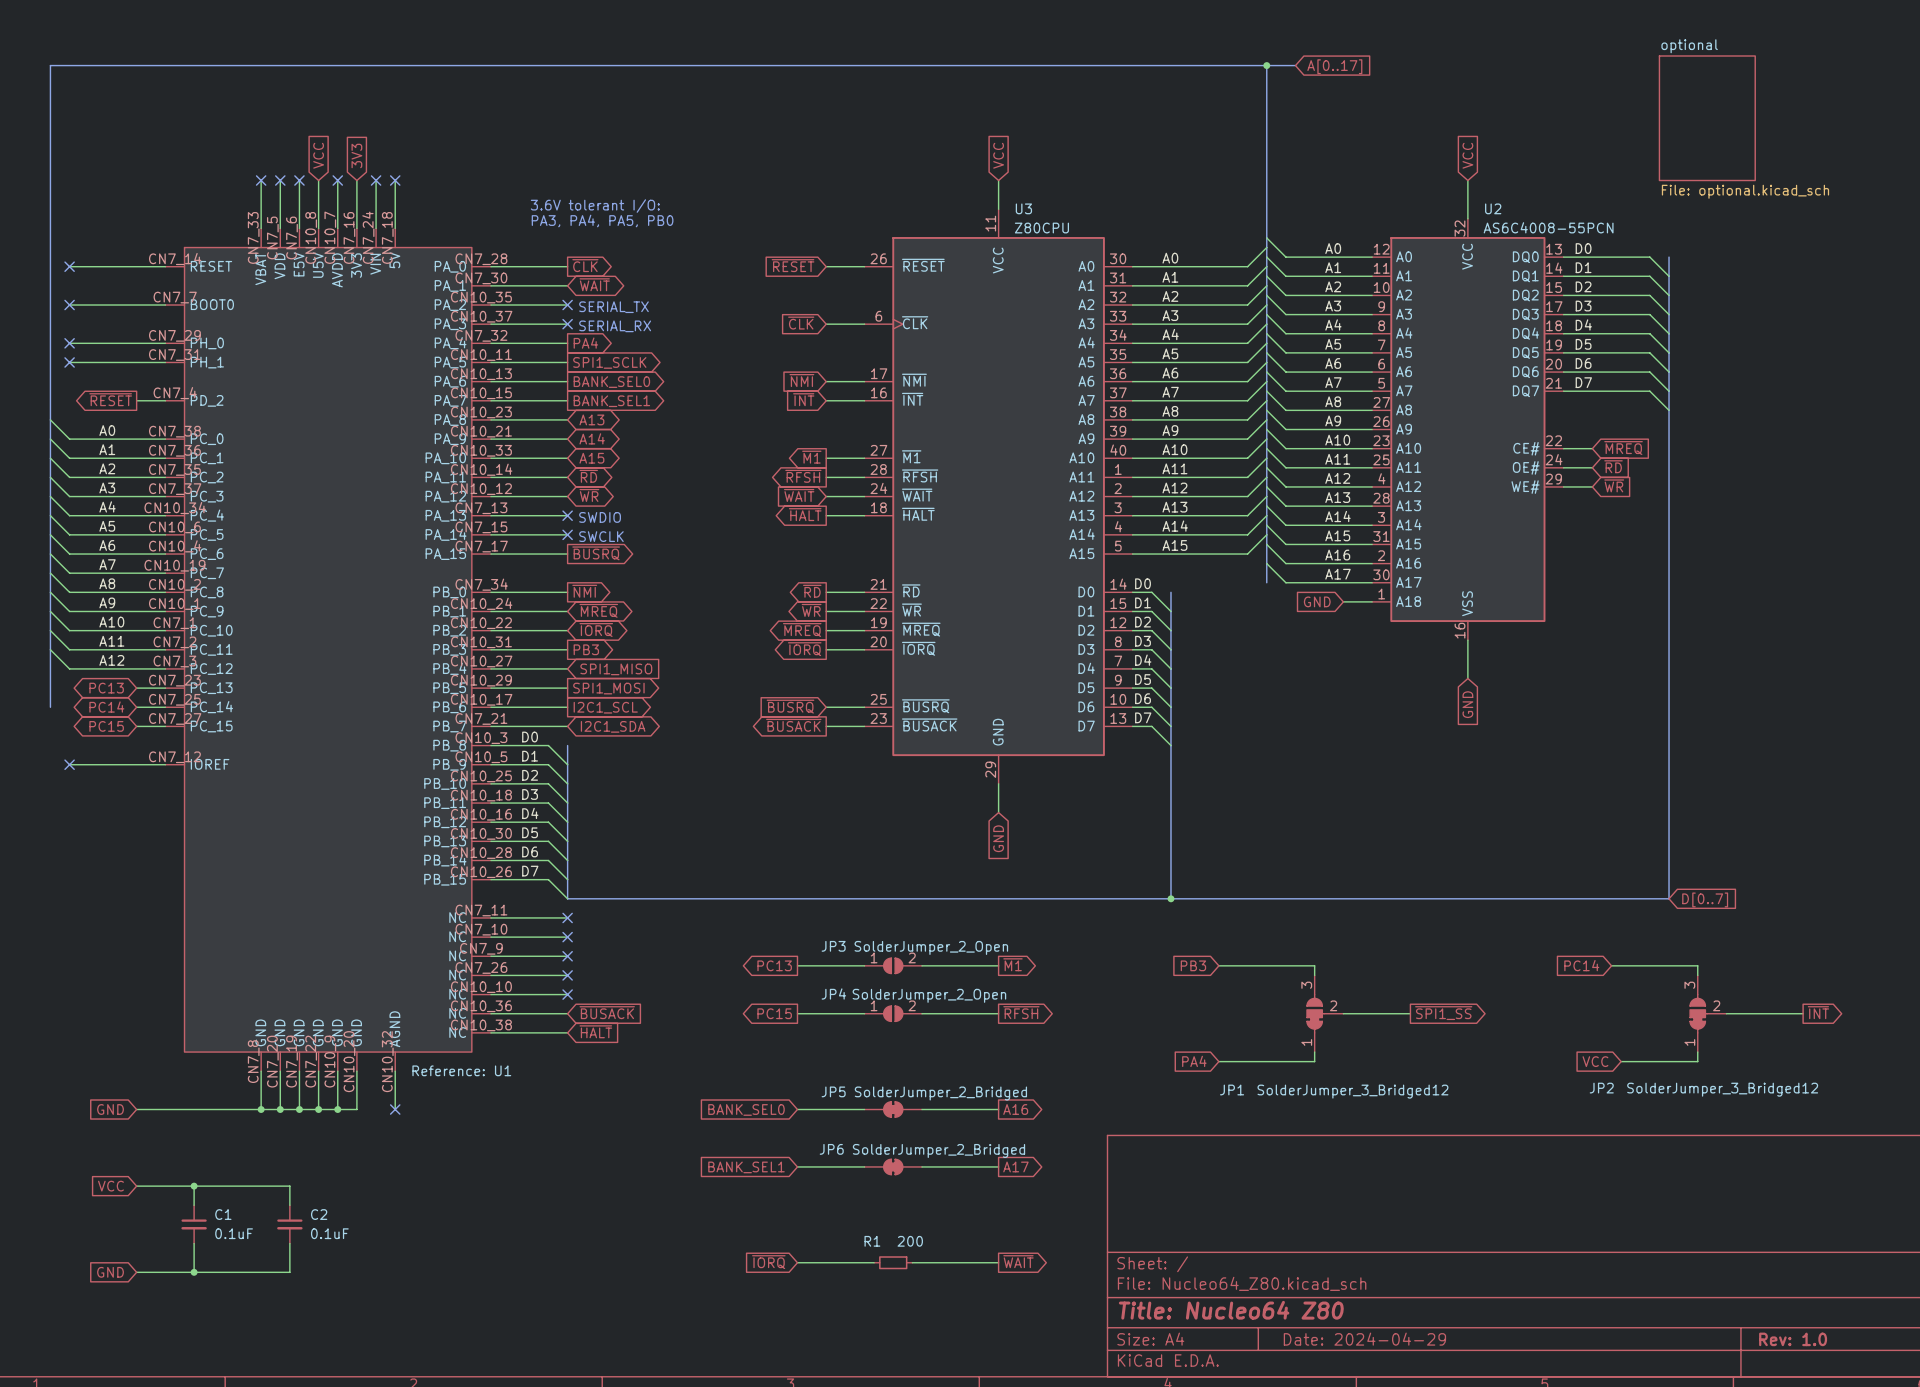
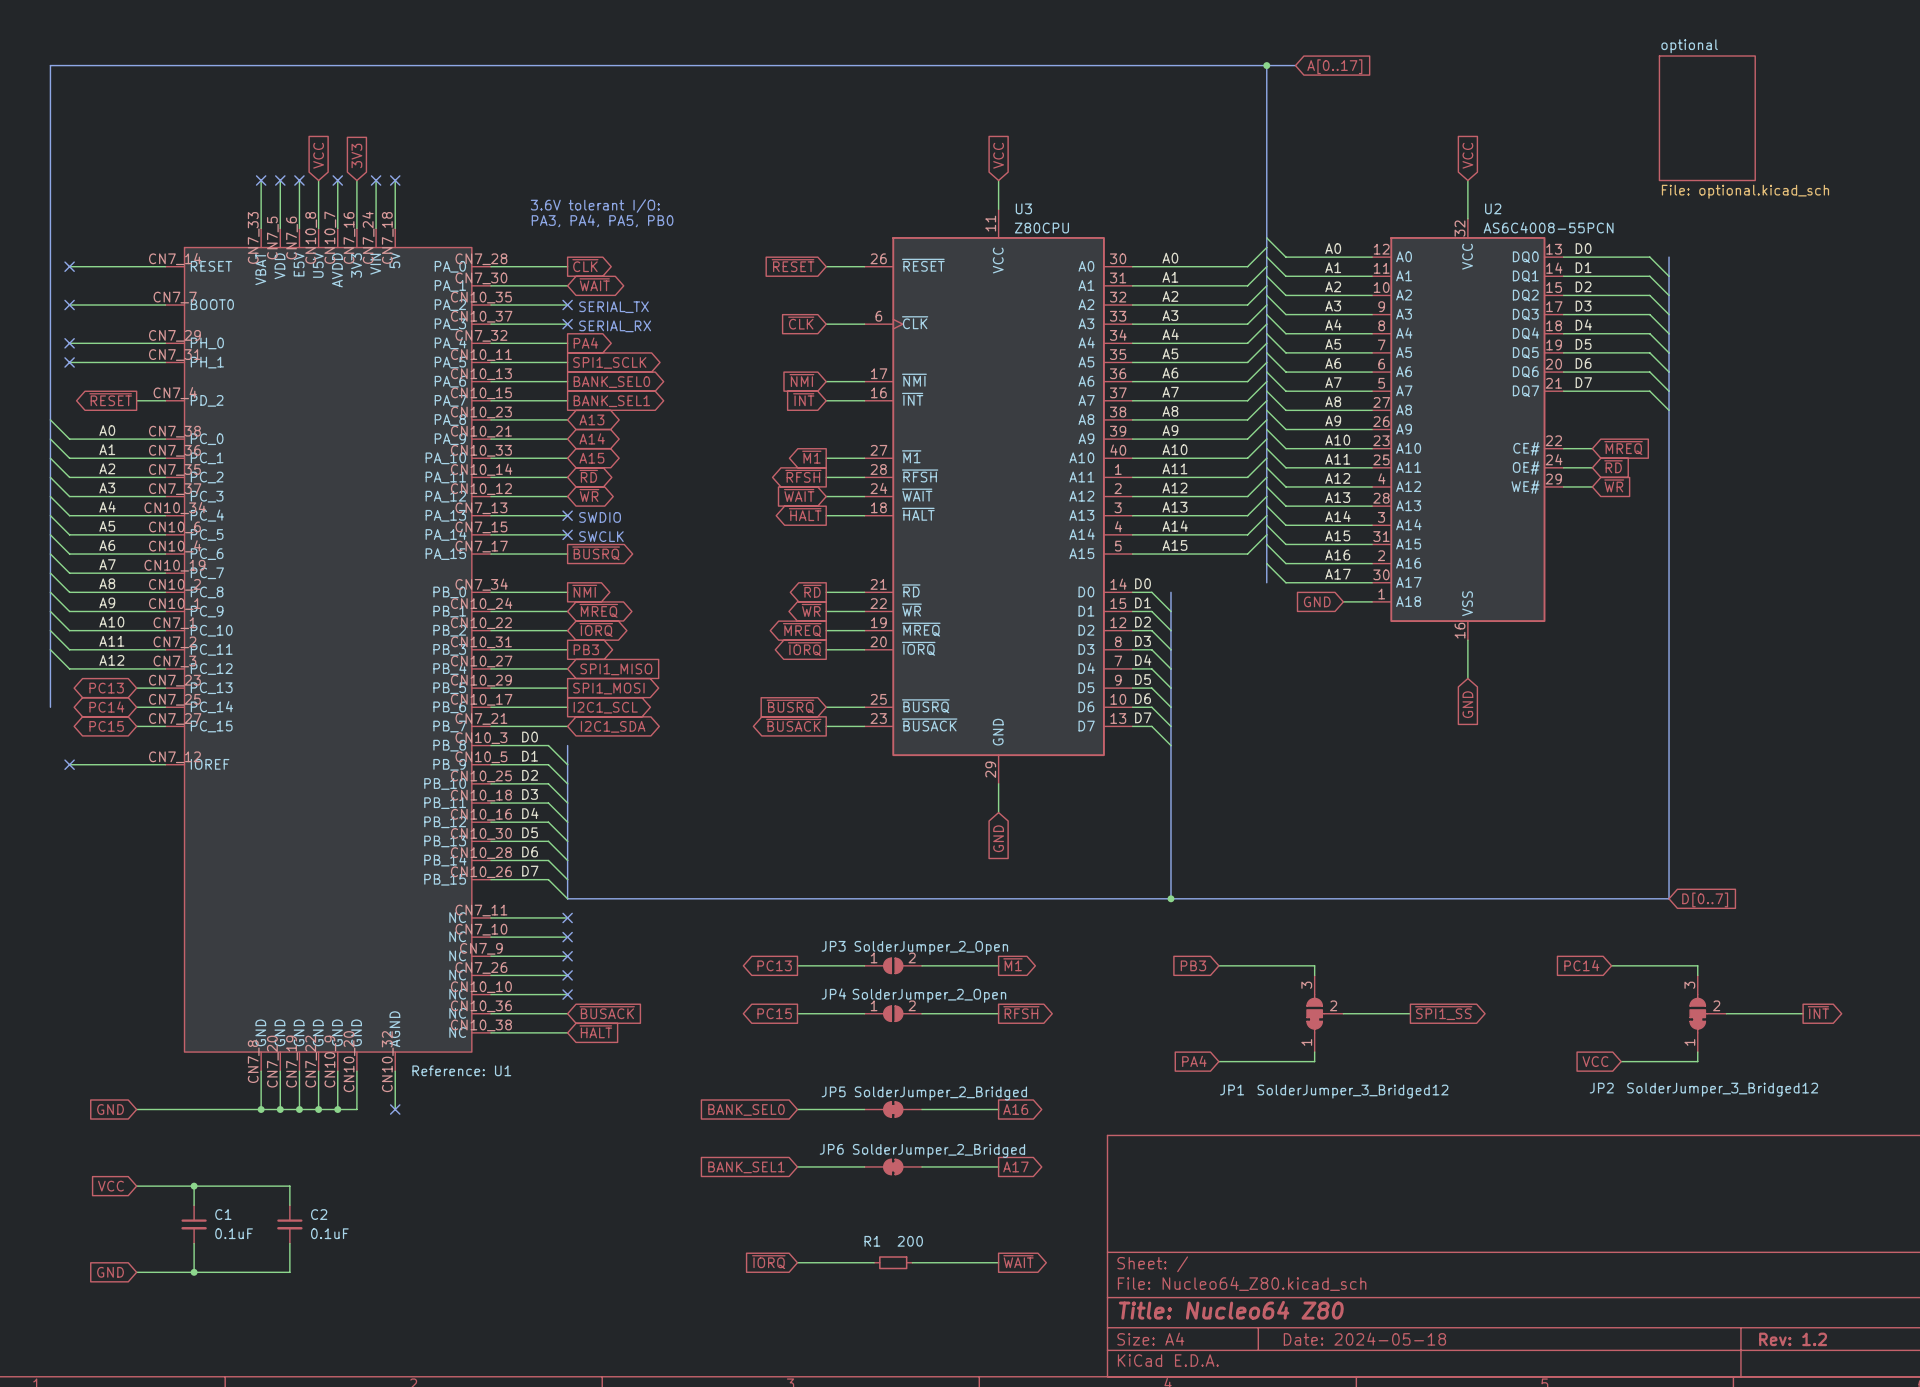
title block: Date: 2024-04-29 (1364, 1339) -> Date: 2024-05-18 (1364, 1339)
title block: Rev: 1.0 (1793, 1339) -> Rev: 1.2 (1793, 1339)

